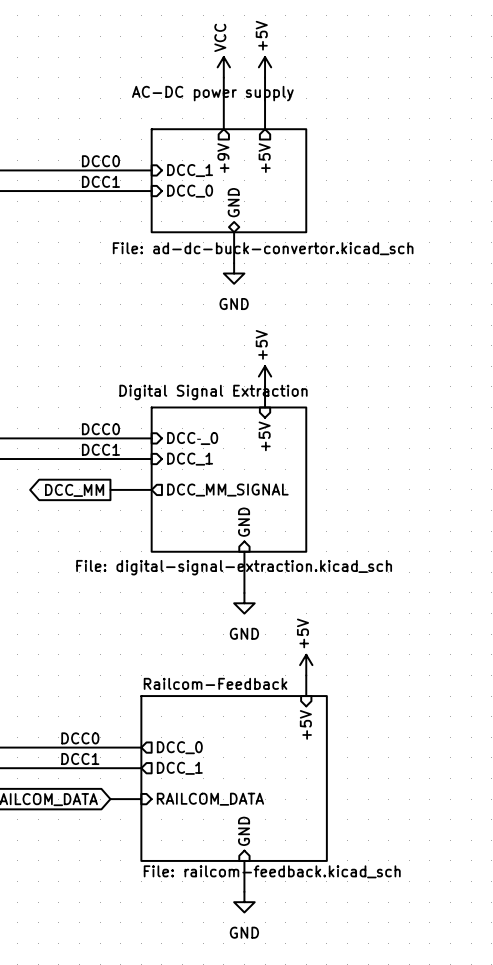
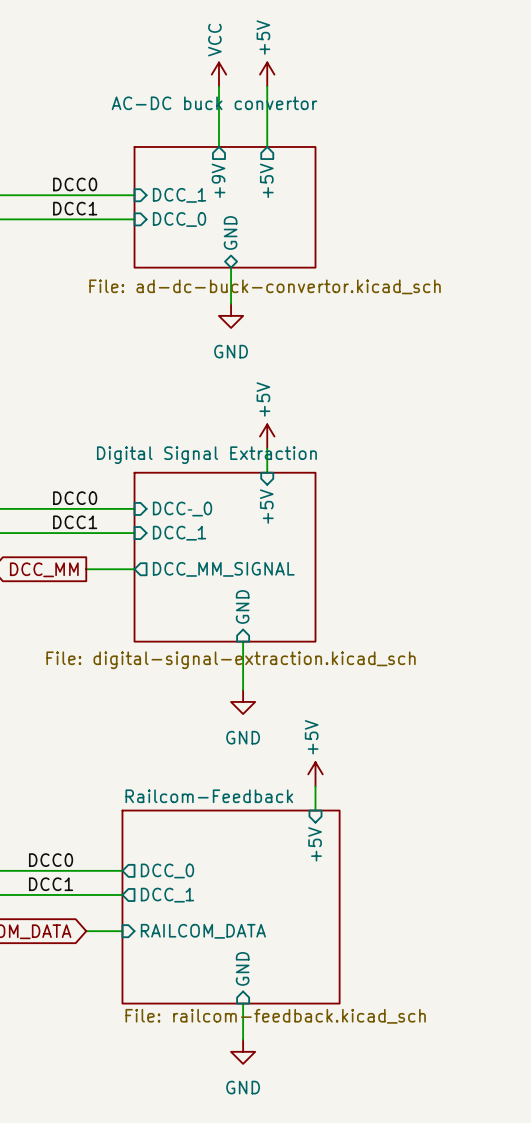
sheet AC-DC power supply name: AC-DC power supply (212, 93) -> AC-DC buck convertor (214, 103)

